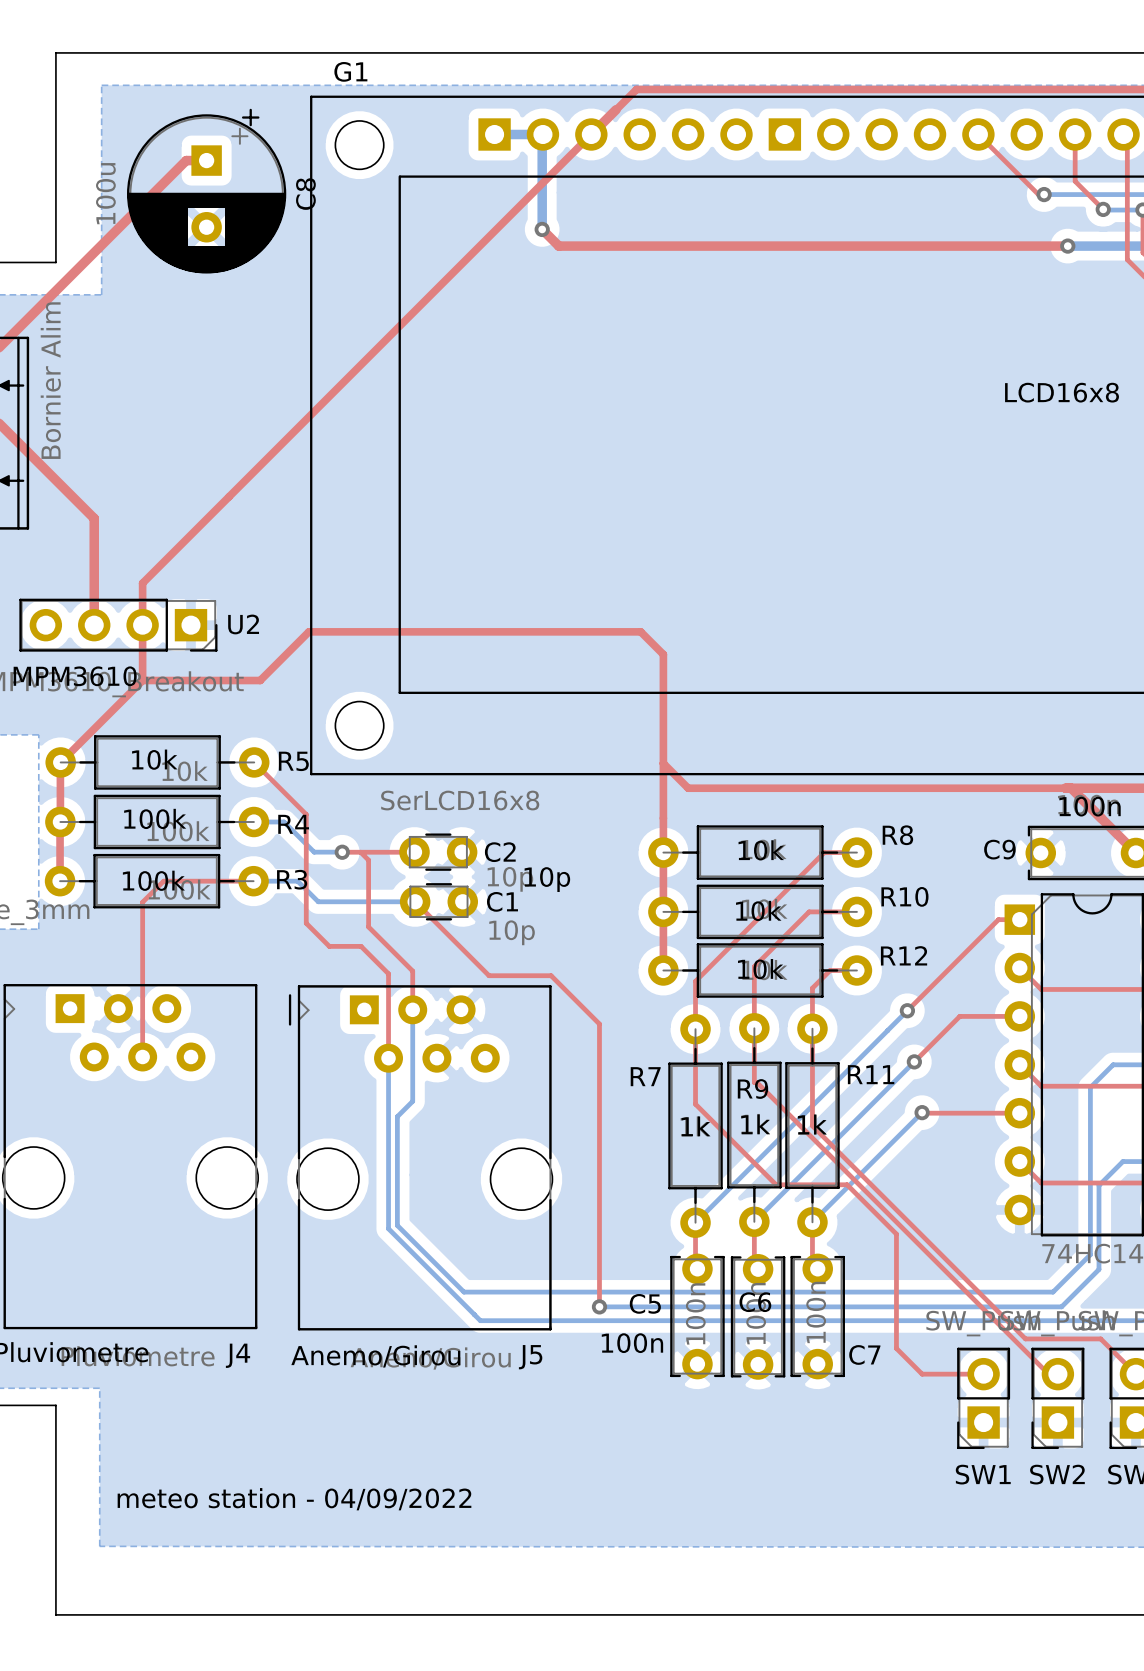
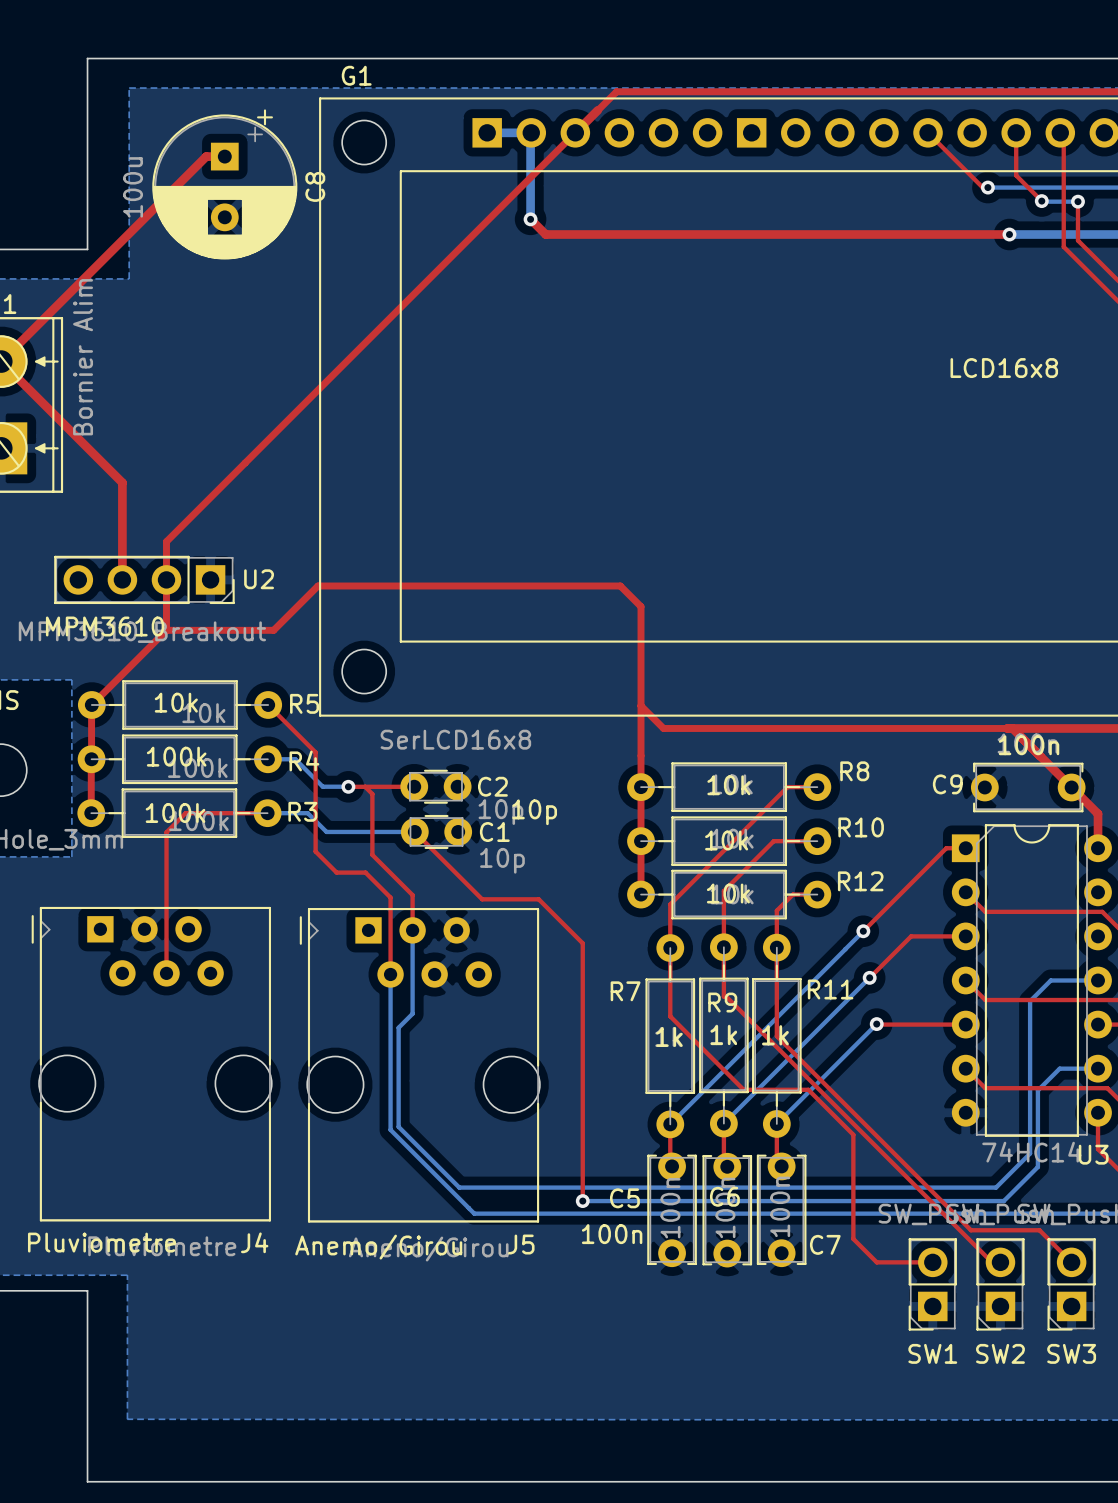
text: meteo station - 04/09/2022 (294, 1499) -> none

